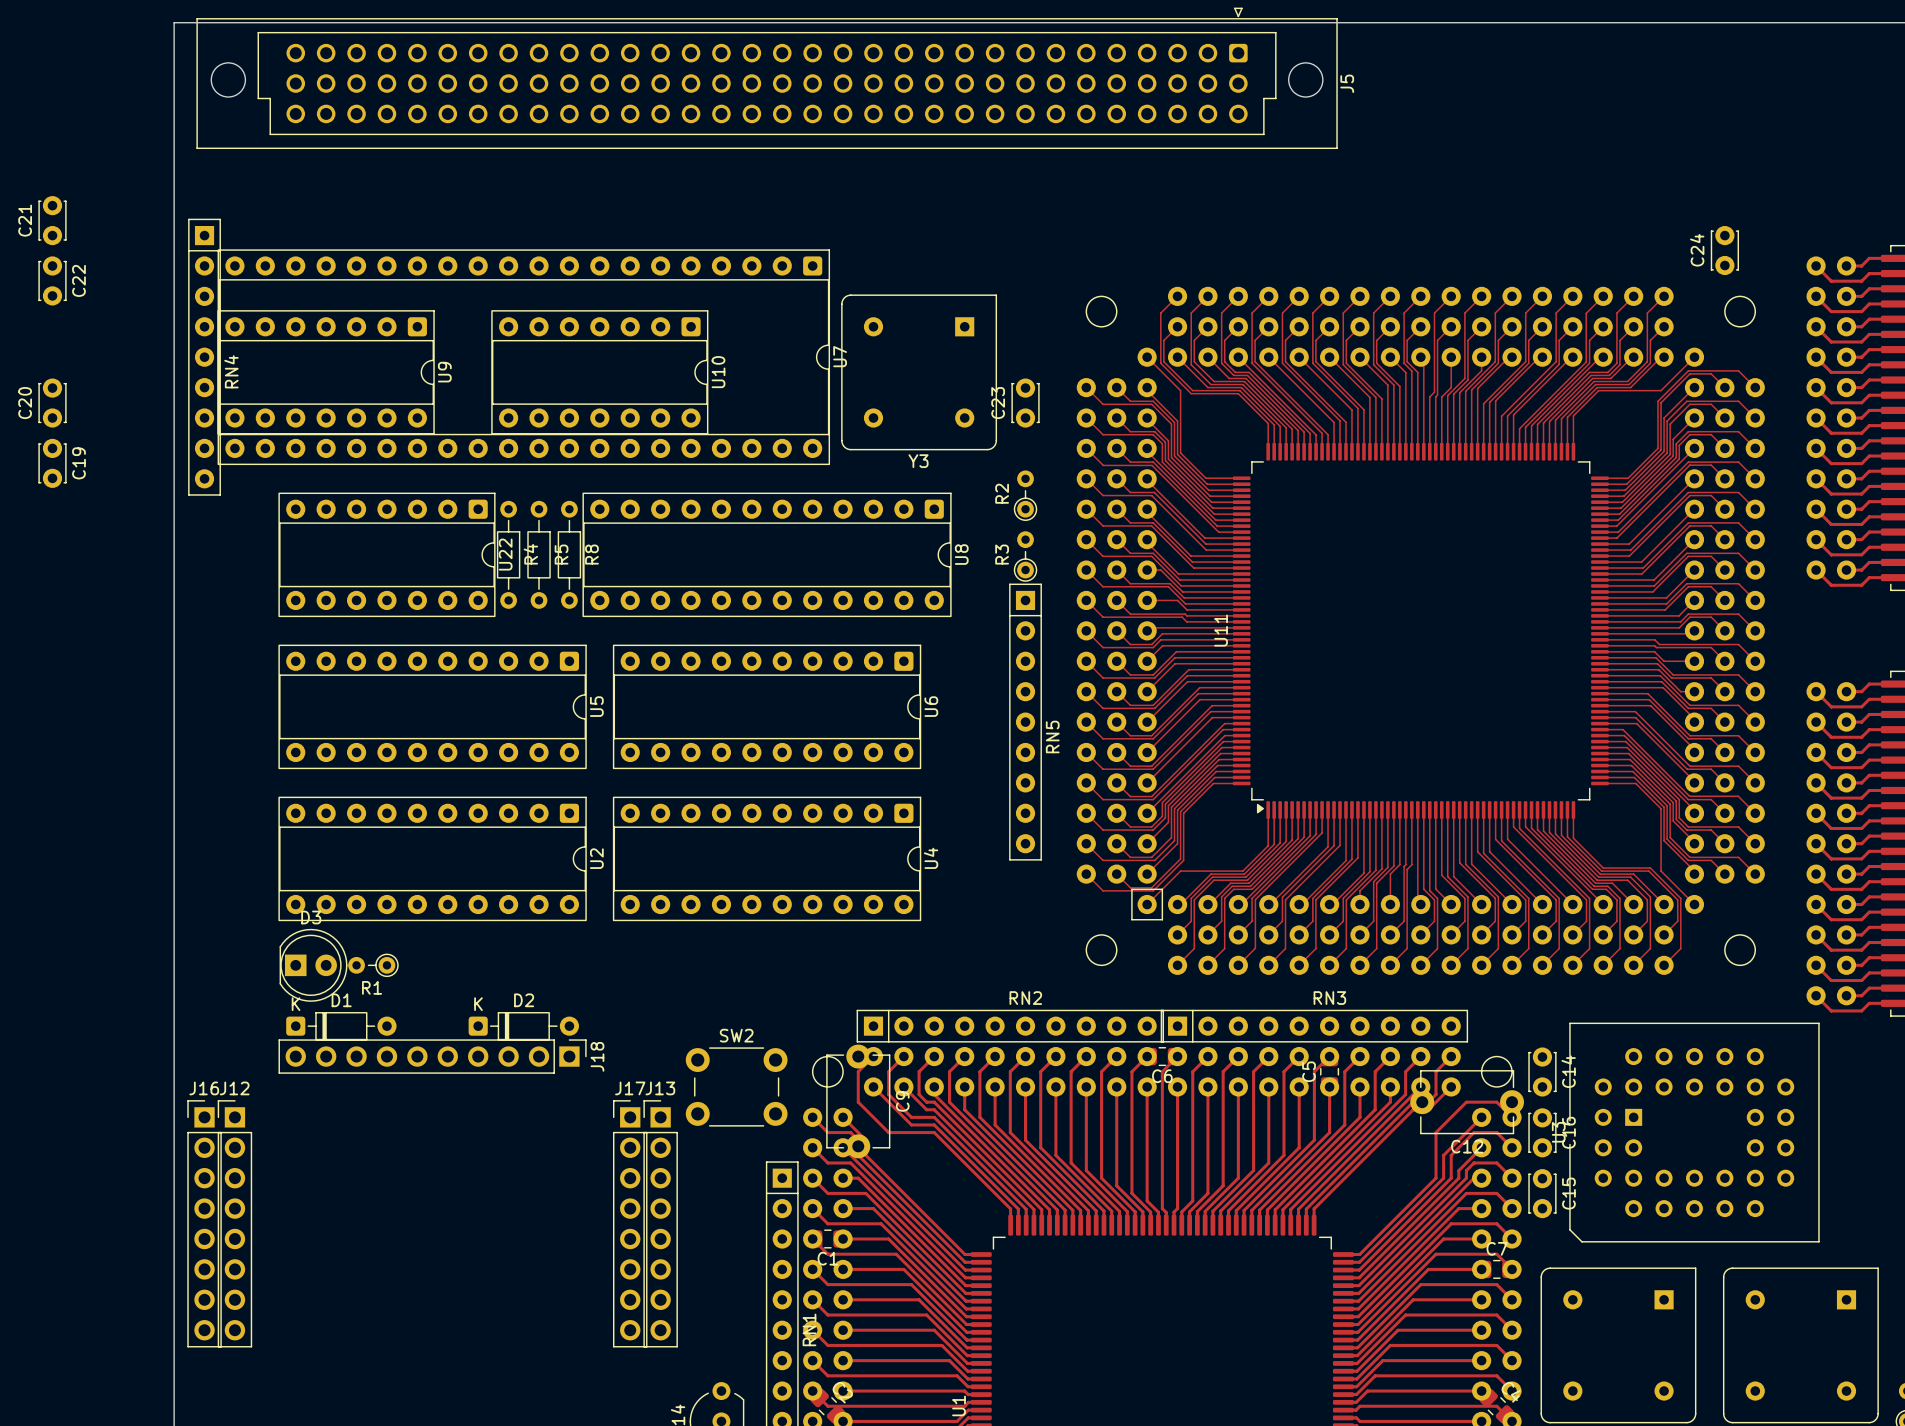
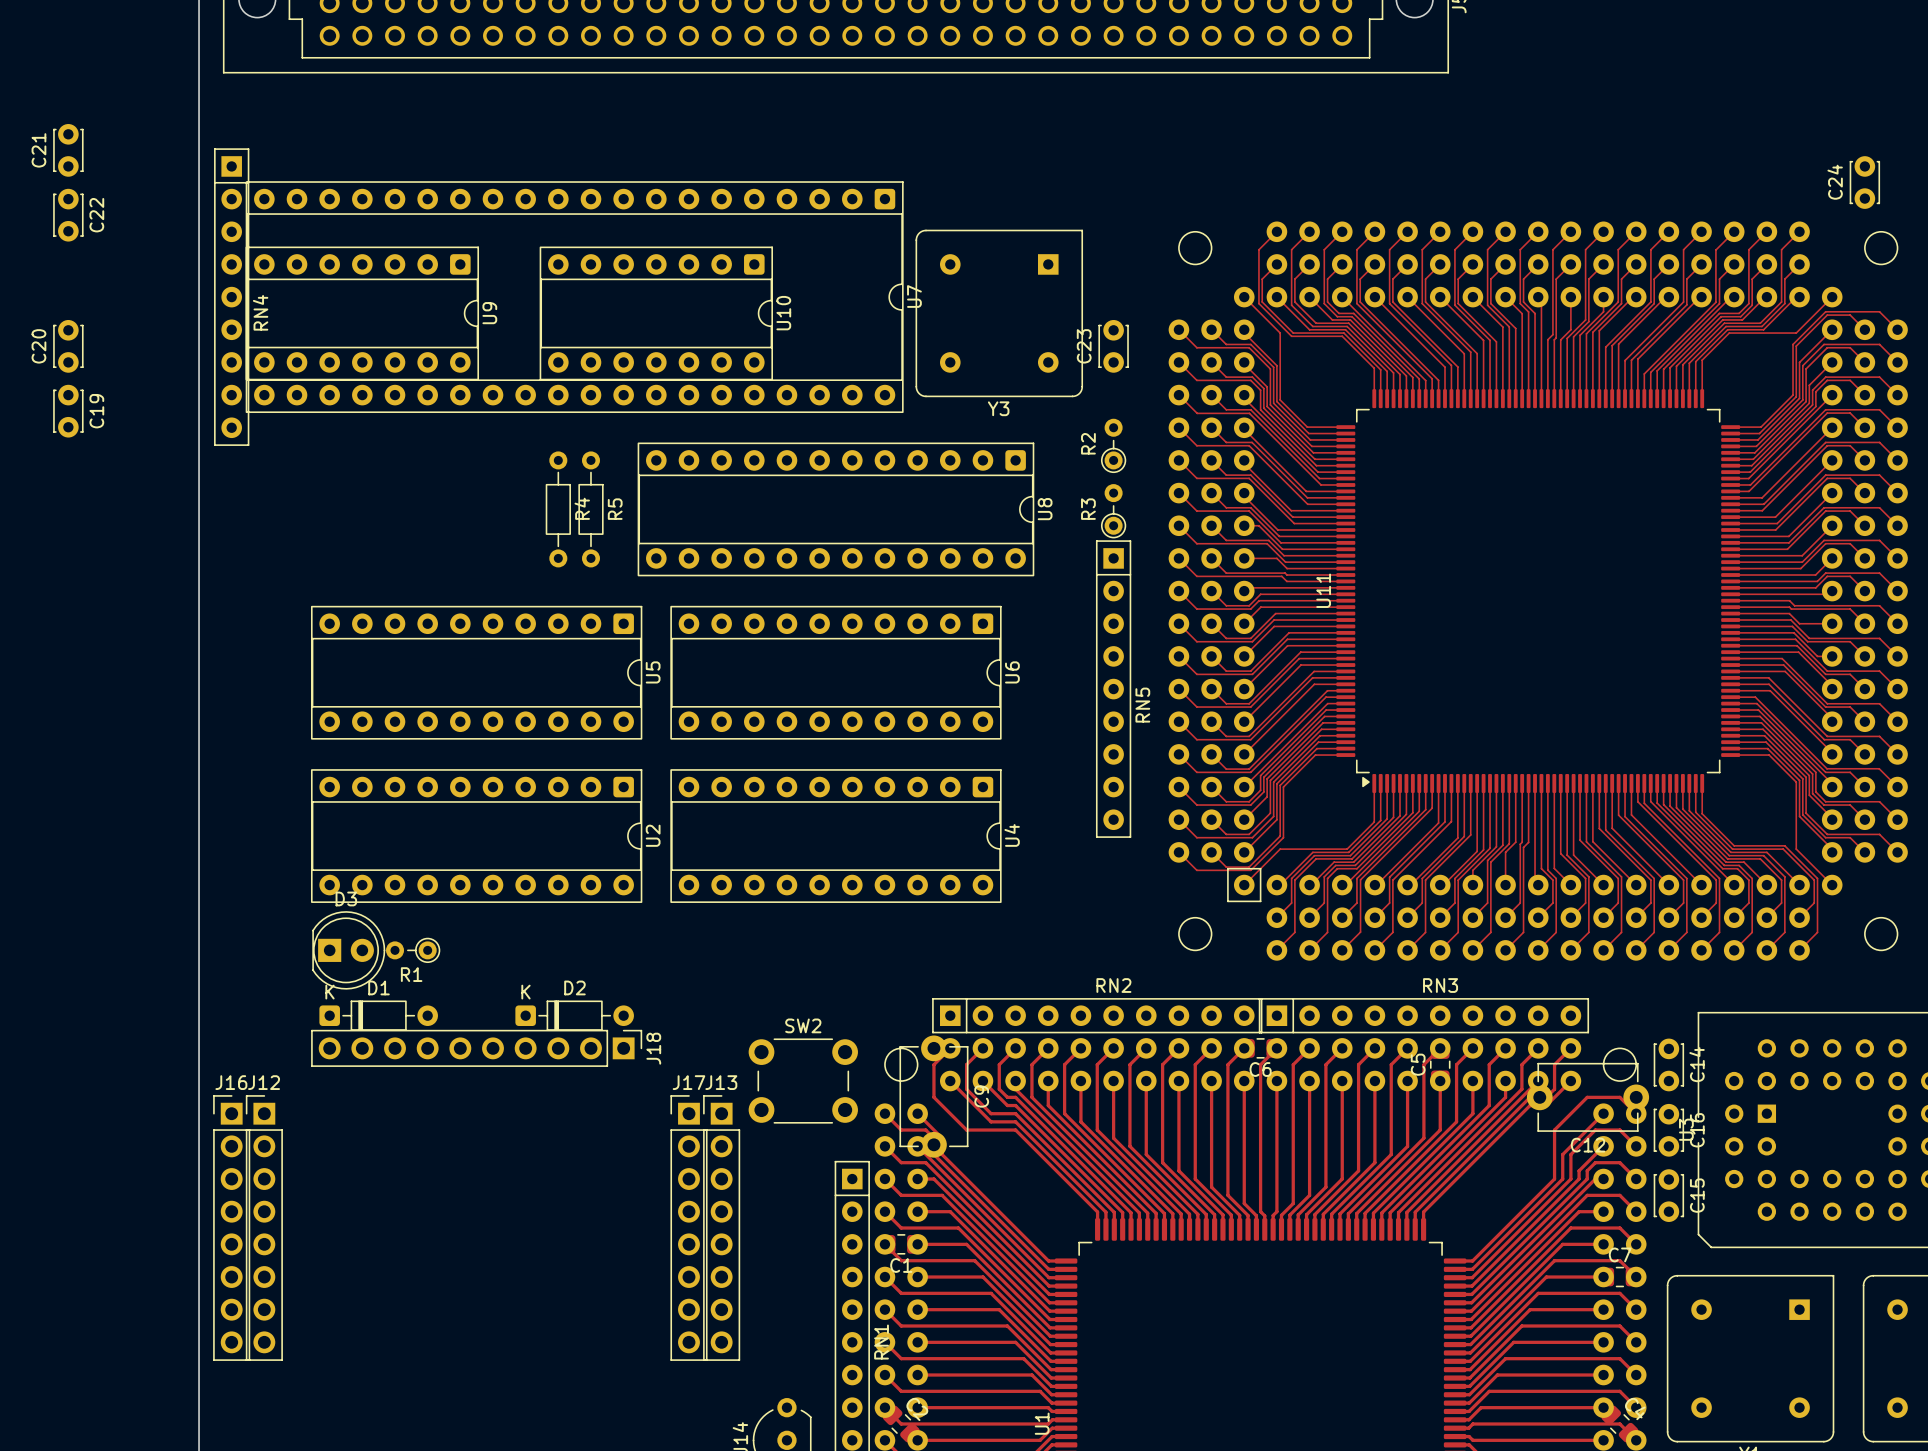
U22: (386, 554) -> none
R8: (569, 554) -> none

